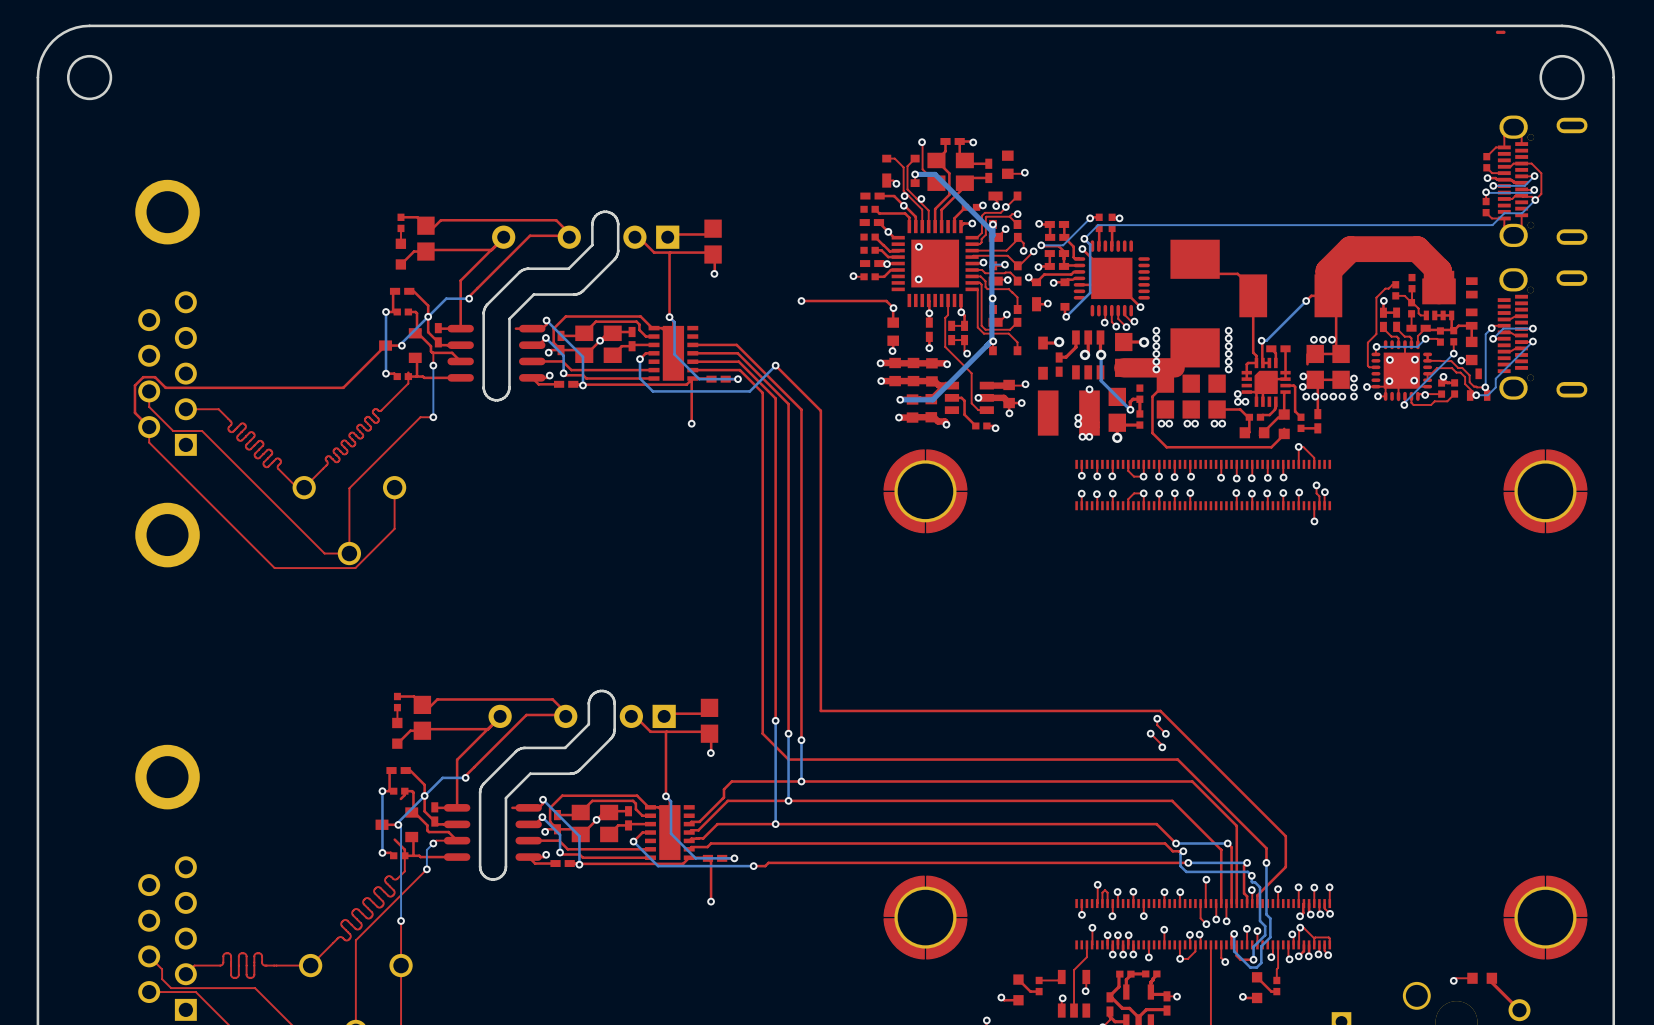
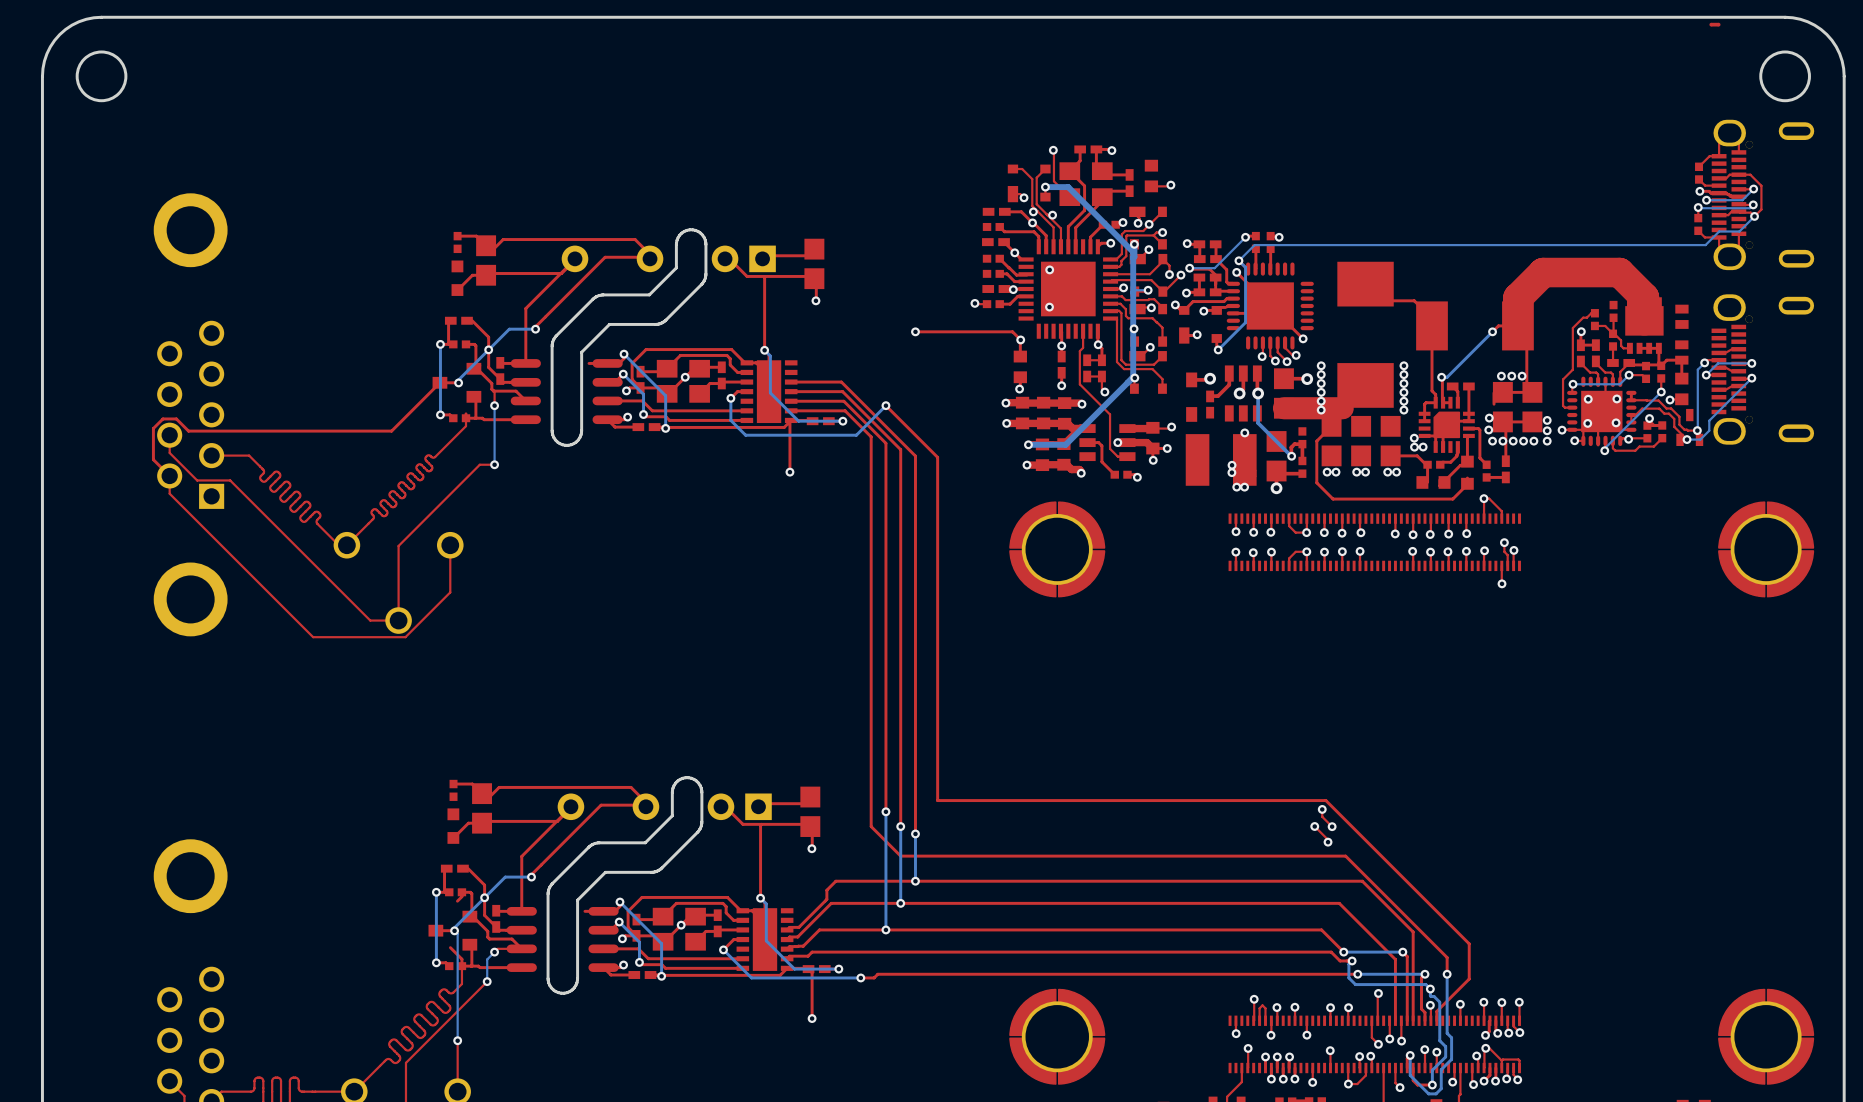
top track: (401, 228) (401, 243) -> none
top track: (397, 707) (397, 722) -> none

